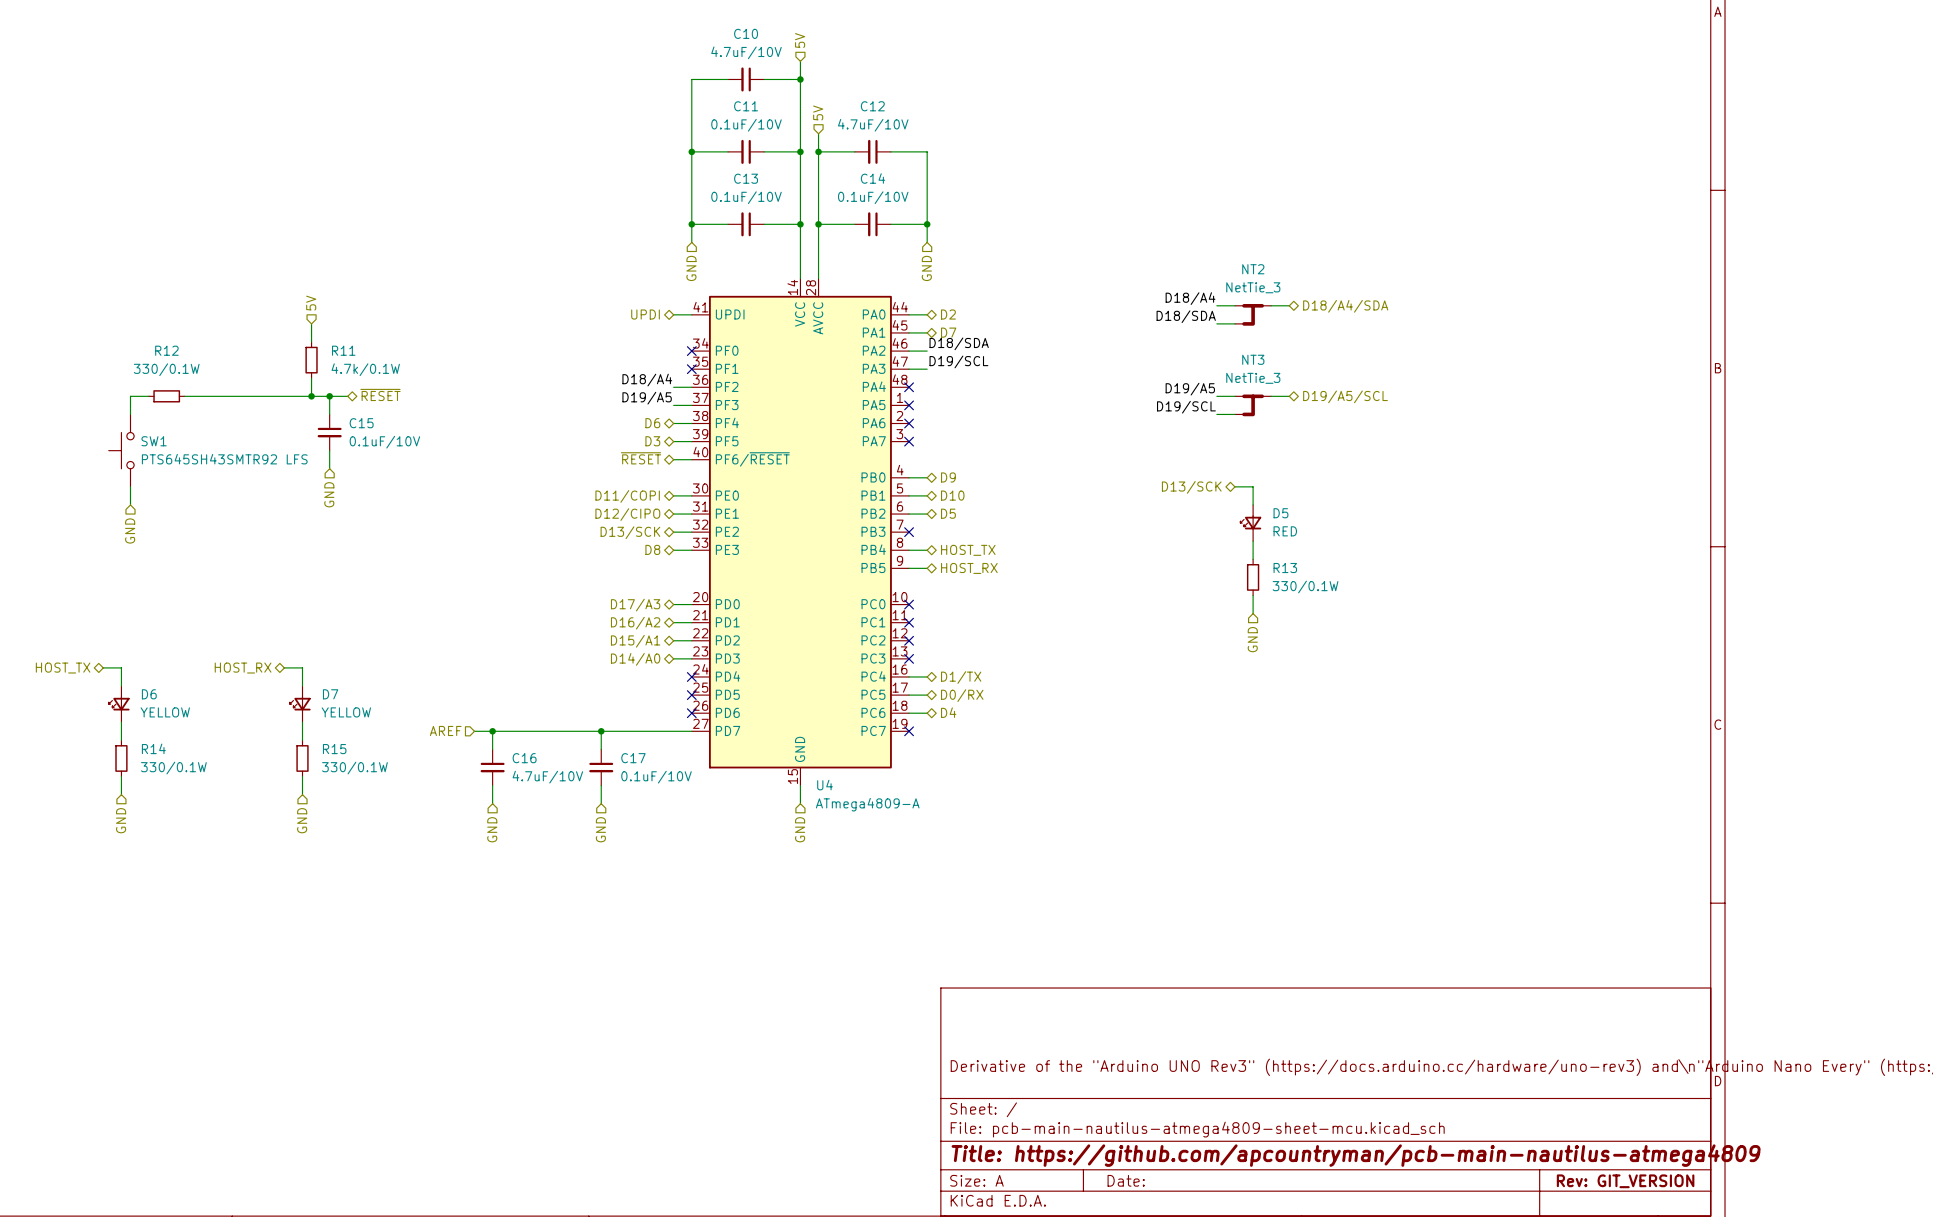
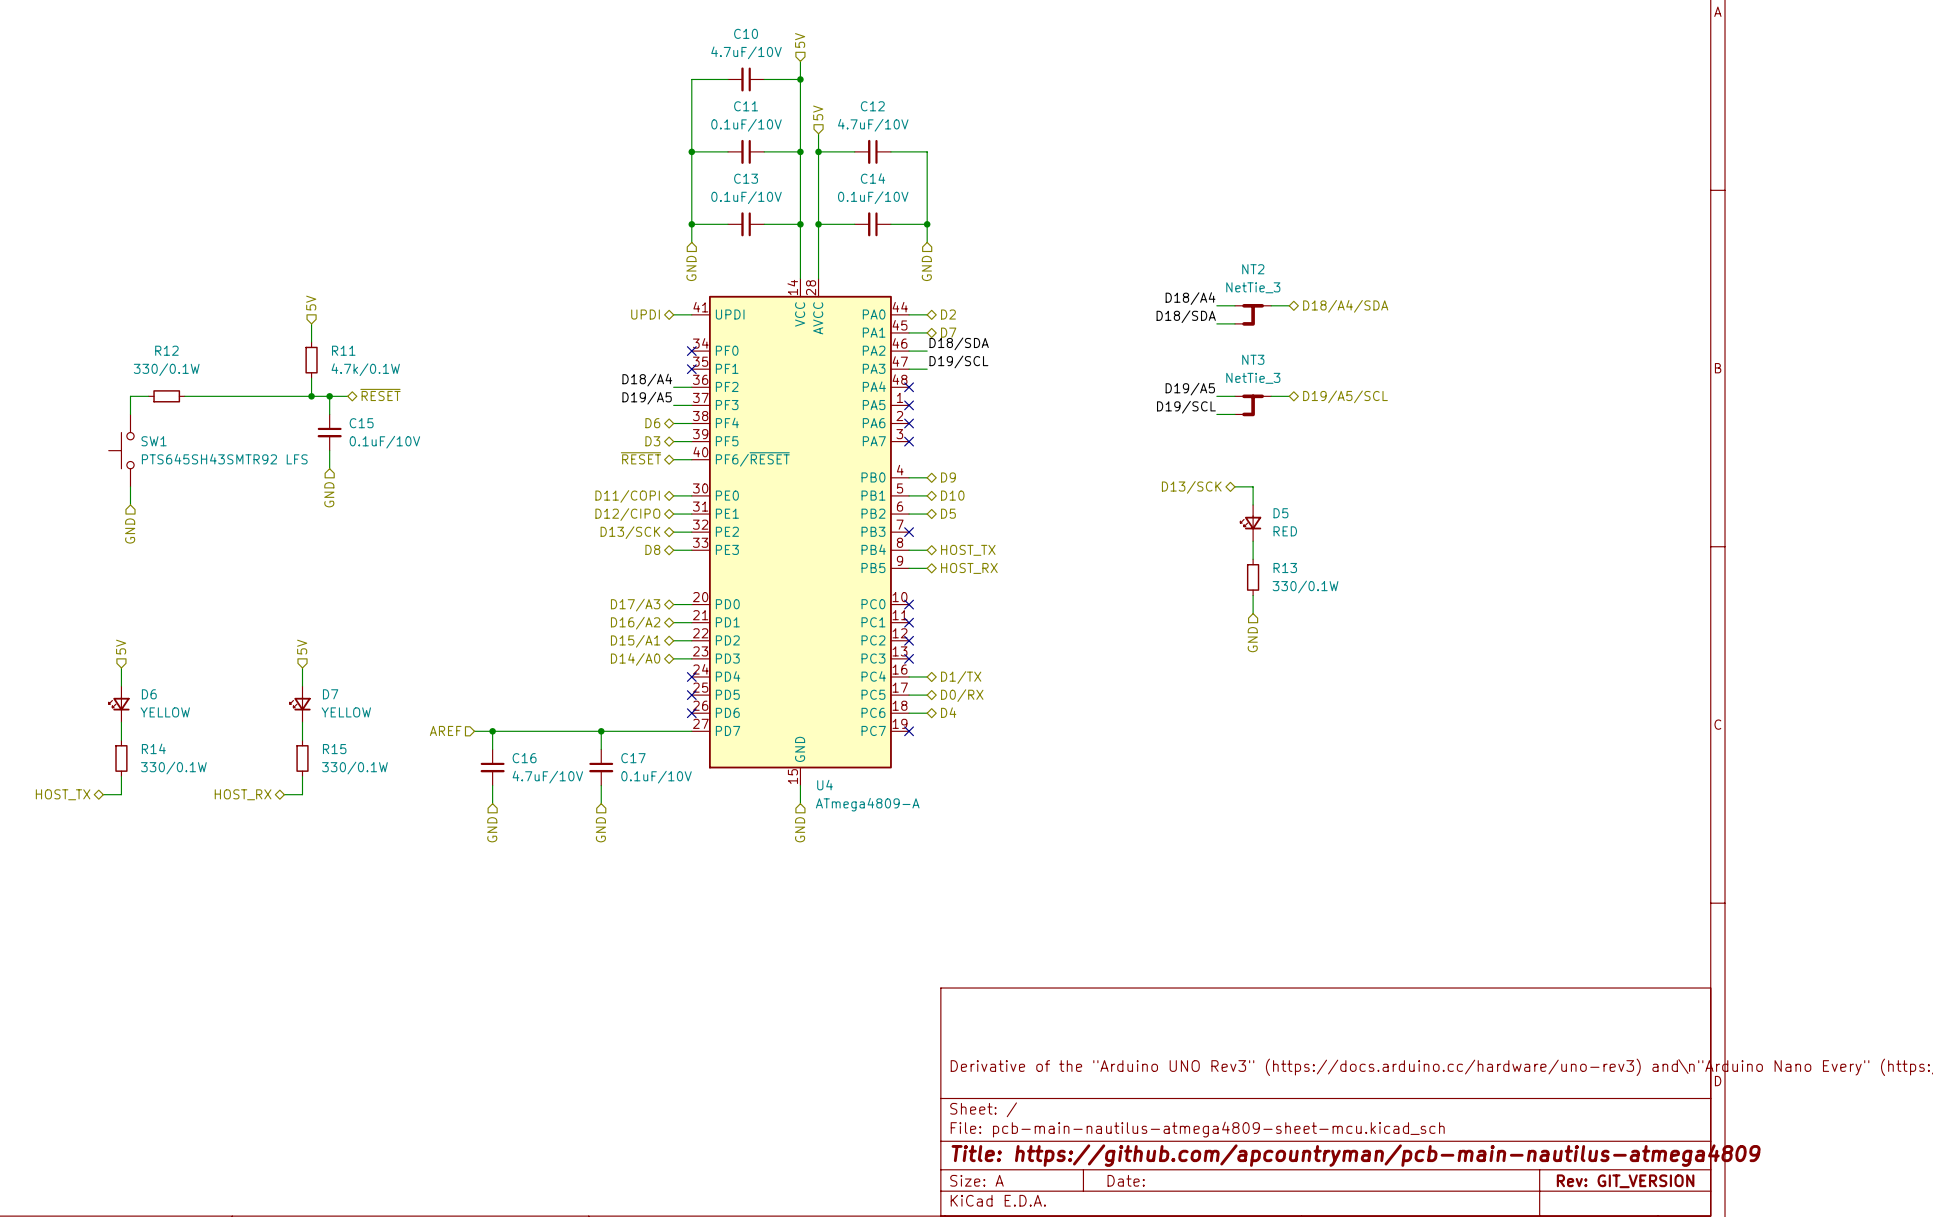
hierarchical label: none -> 5V (121, 647)
hierarchical label: none -> 5V (302, 647)
wire: (103, 667) (121, 667) -> (103, 794) (121, 794)
wire: (284, 667) (302, 667) -> (284, 794) (302, 794)
hierarchical label position: HOST_TX (63, 668) -> HOST_TX (63, 794)
hierarchical label position: HOST_RX (243, 668) -> HOST_RX (243, 794)
hierarchical label: GND (121, 820) -> none
hierarchical label: GND (302, 820) -> none

